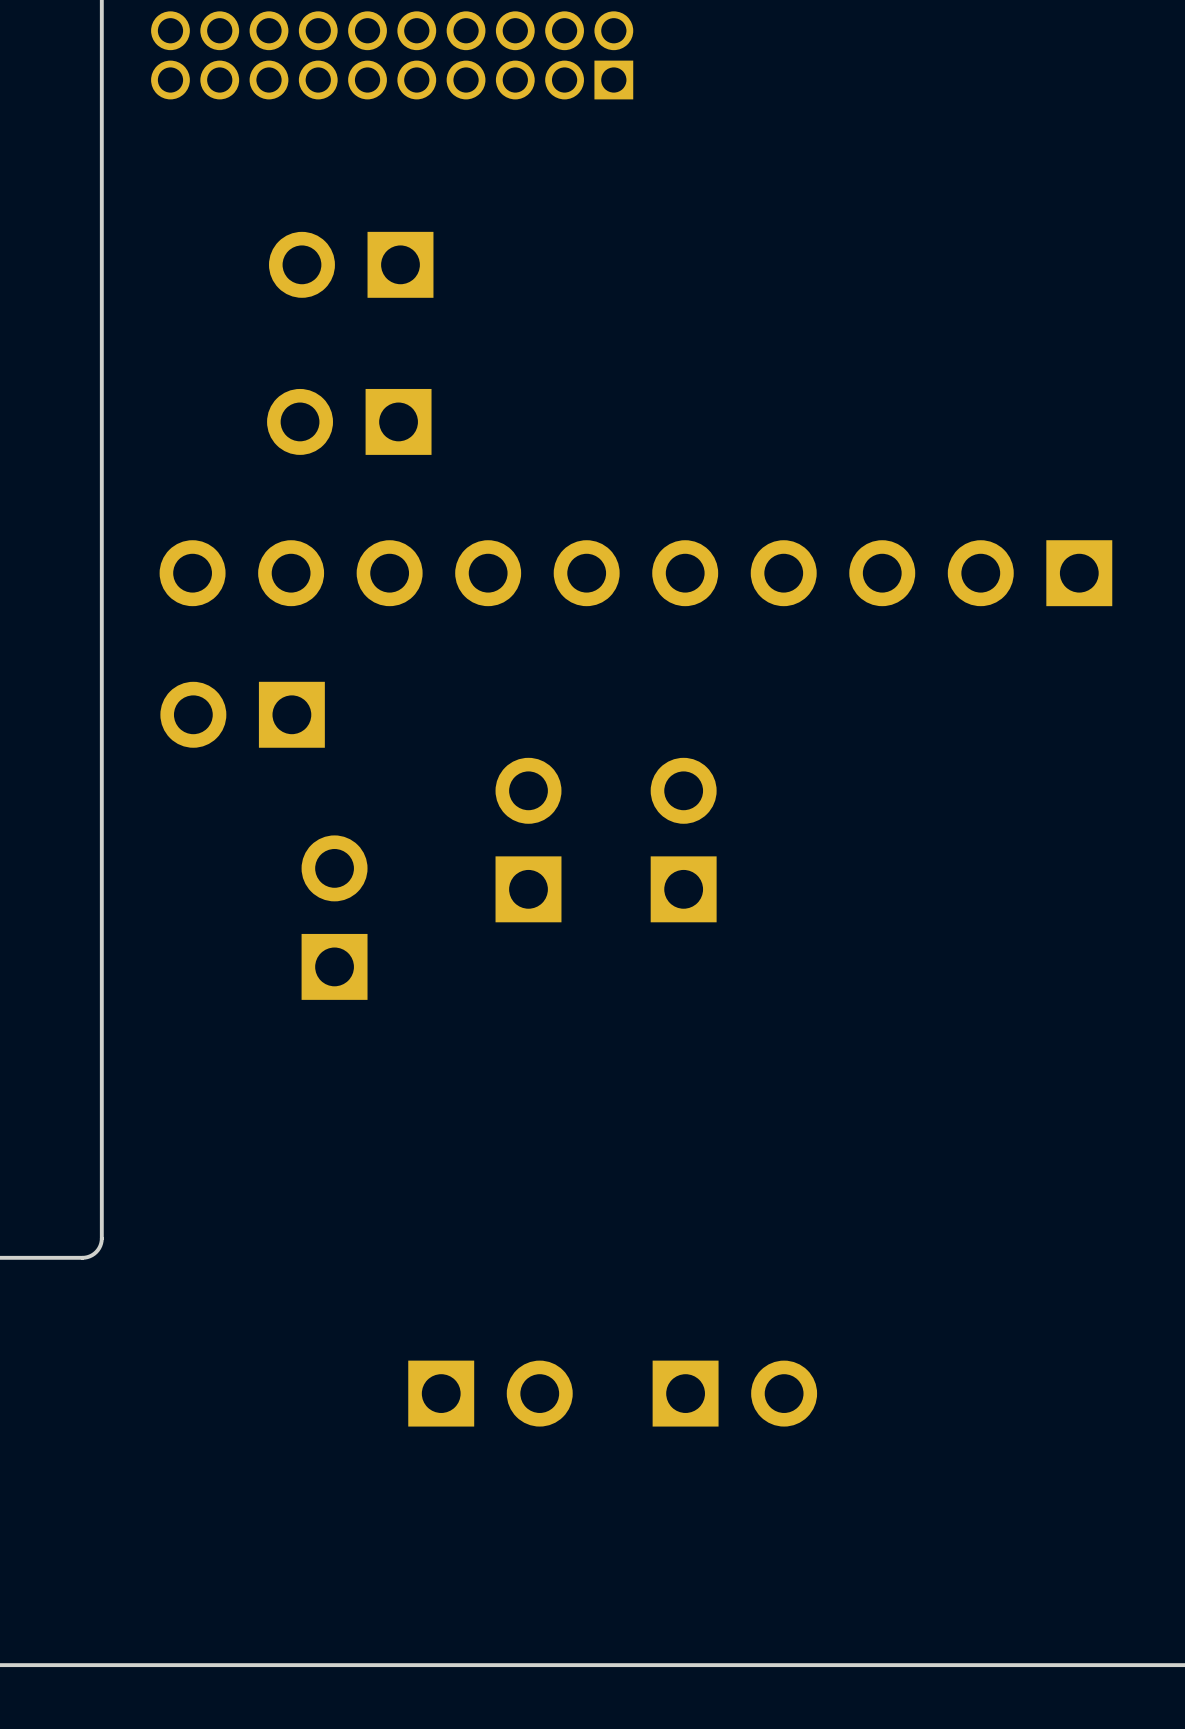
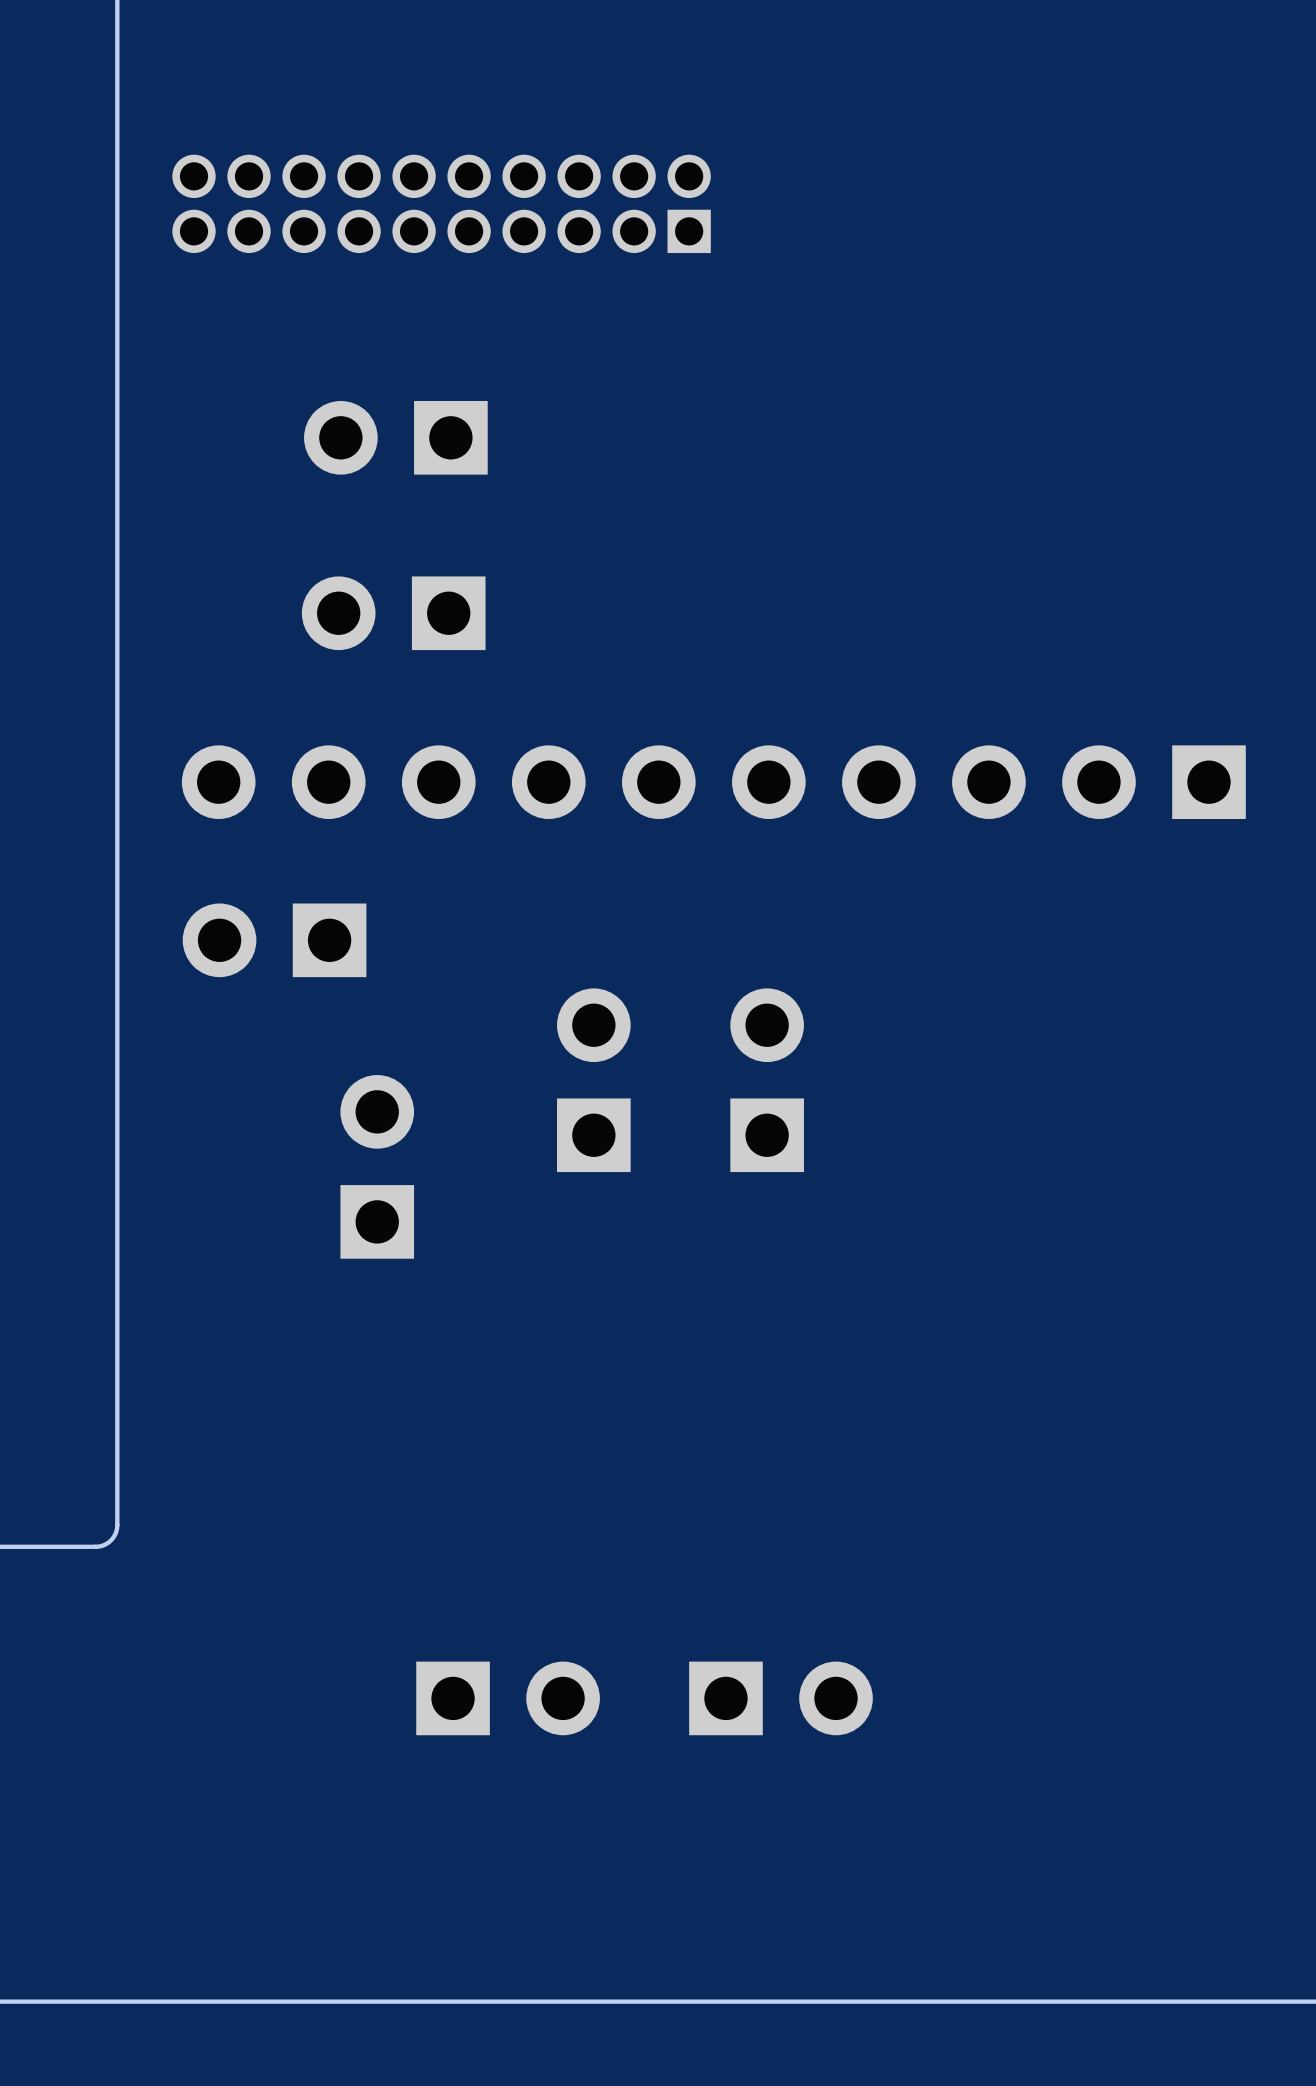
part position: (490, 1393) -> (508, 1698)
part position: (734, 1393) -> (780, 1698)

